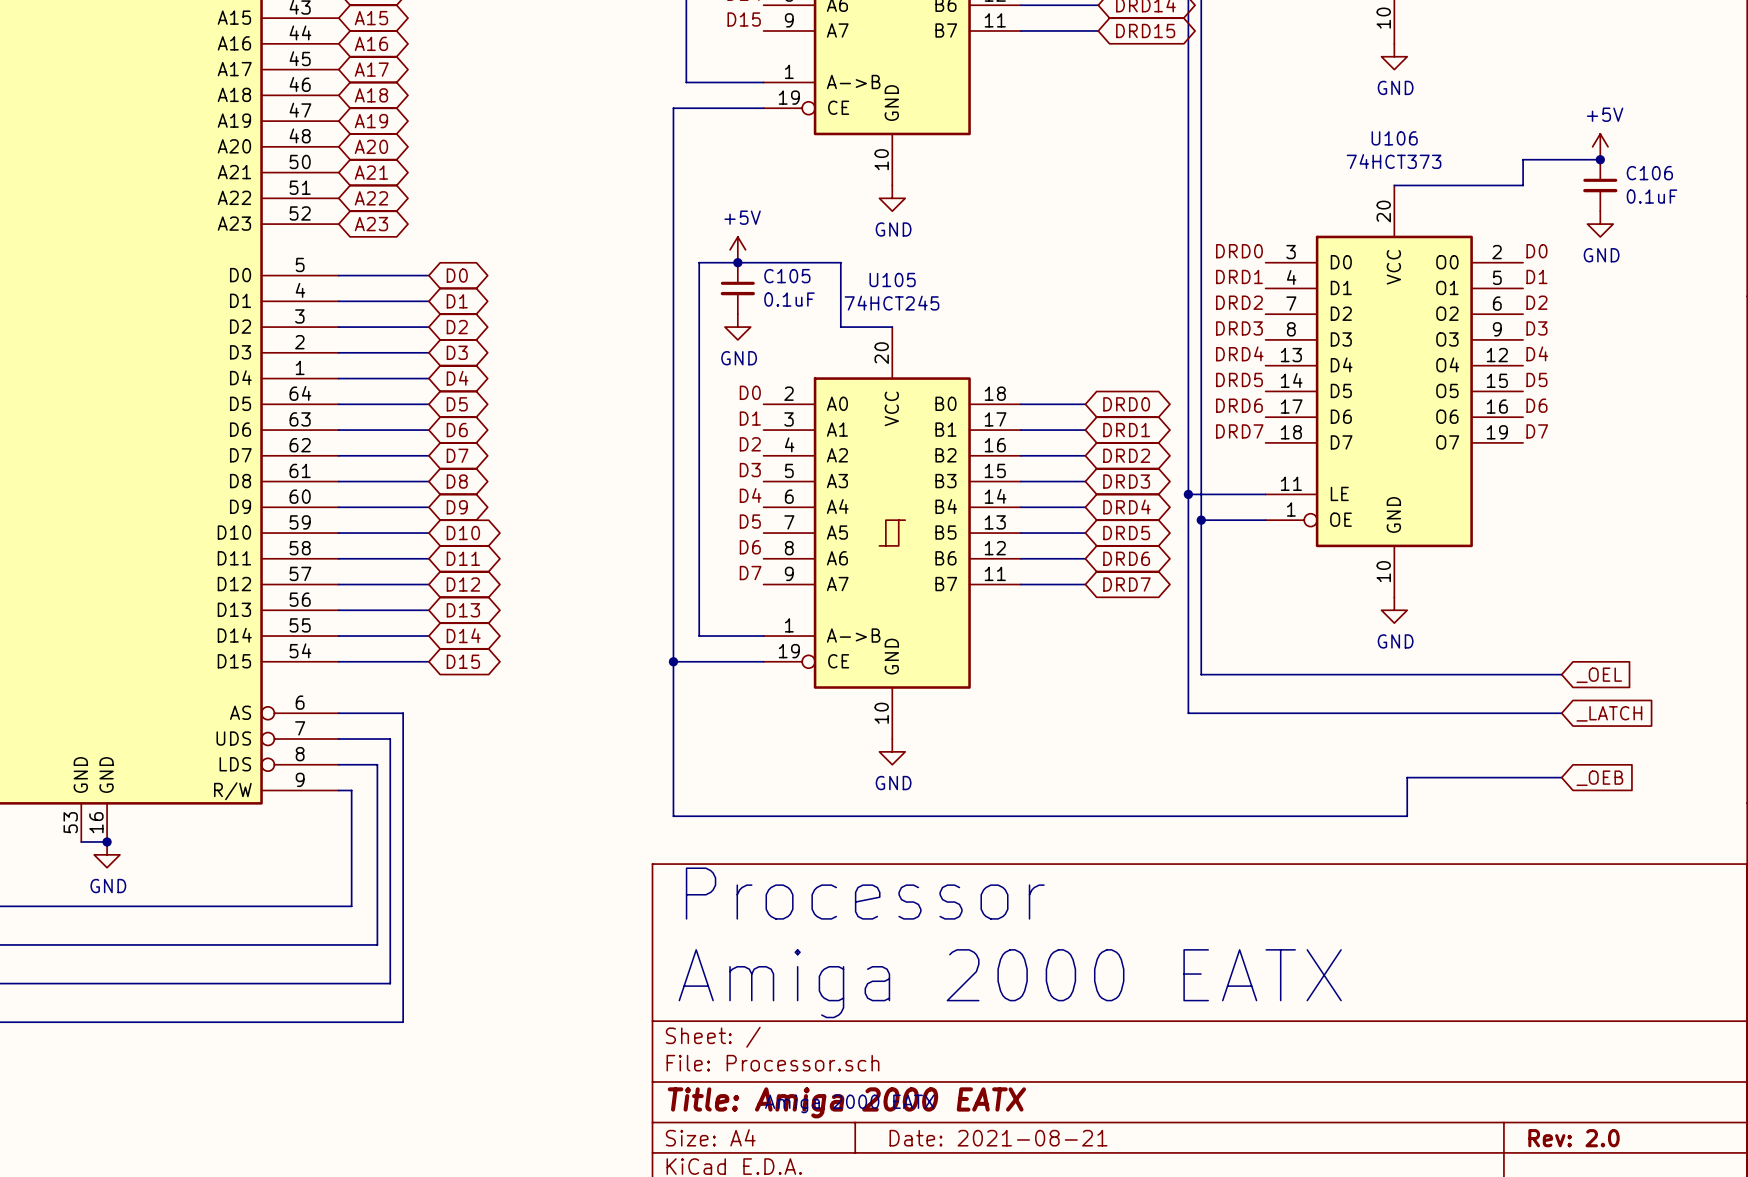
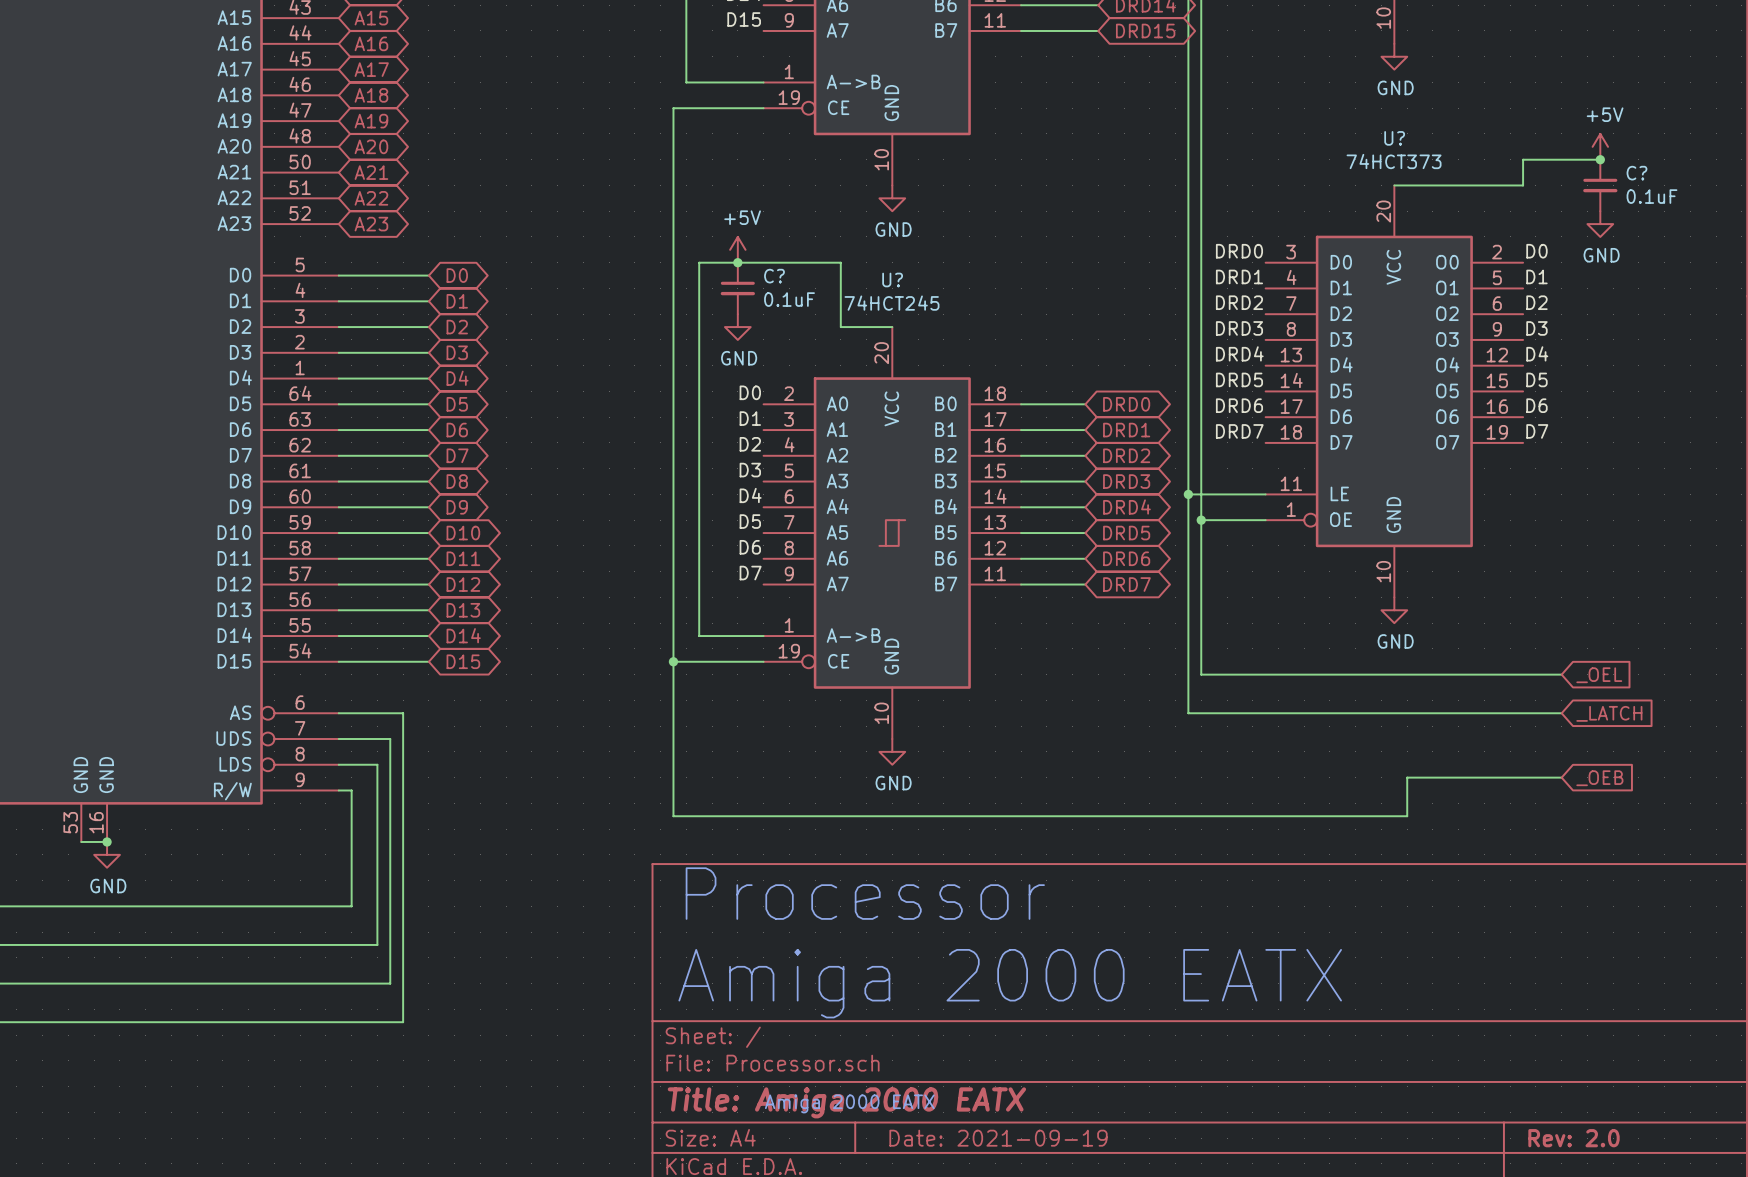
U106 name: U106 (1394, 138) -> U? (1394, 138)
C106 name: C106 (1649, 173) -> C? (1636, 173)
C105 name: C105 (787, 276) -> C? (774, 276)
U105 name: U105 (892, 279) -> U? (892, 279)
title block: Date: 2021-08-21 (998, 1138) -> Date: 2021-09-19 (998, 1138)

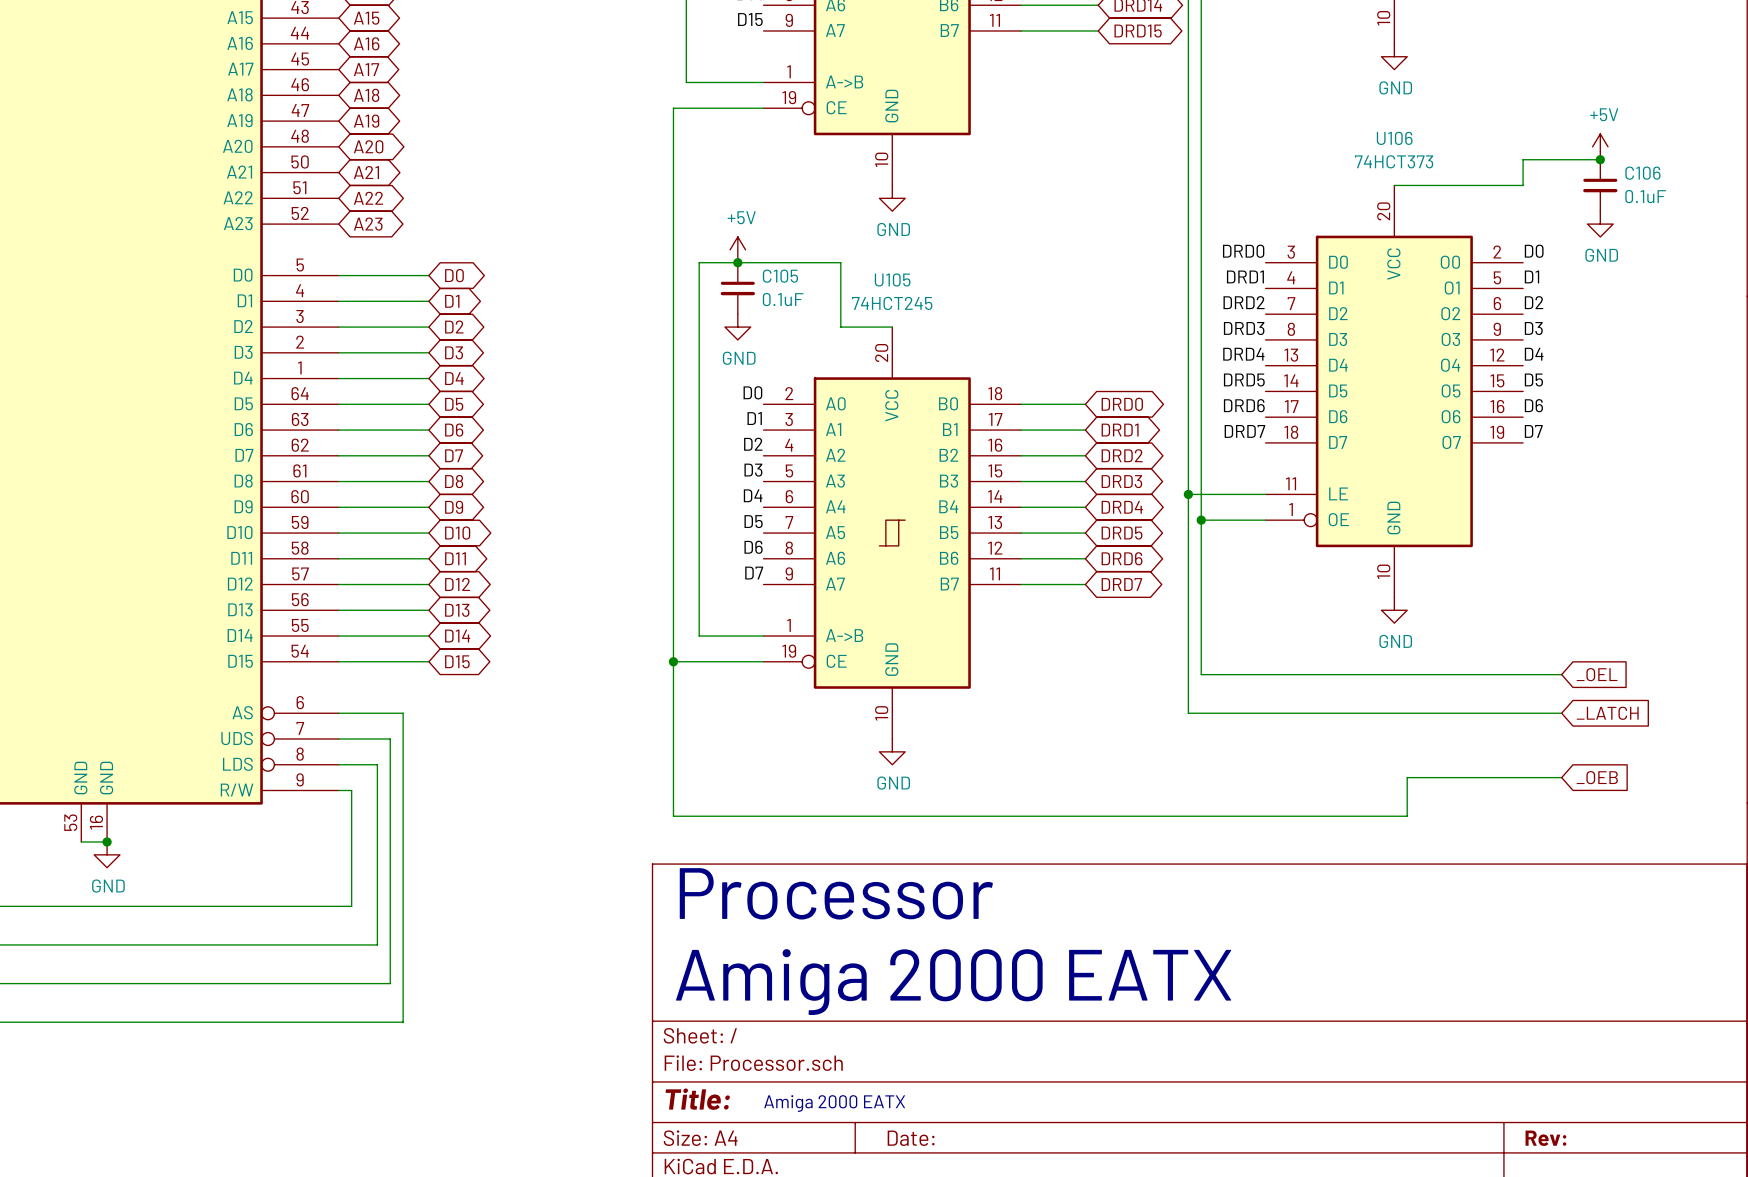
U? name: U? (1394, 138) -> U106 (1394, 138)
C? name: C? (1636, 173) -> C106 (1642, 173)
C? name: C? (774, 276) -> C105 (780, 276)
U? name: U? (892, 279) -> U105 (892, 279)
title block: Title: Amiga 2000 EATX (846, 1102) -> Title: (697, 1099)
title block: Date: 2021-09-19 (998, 1138) -> Date: (911, 1138)
title block: Rev: 2.0 (1574, 1138) -> Rev: (1545, 1138)

